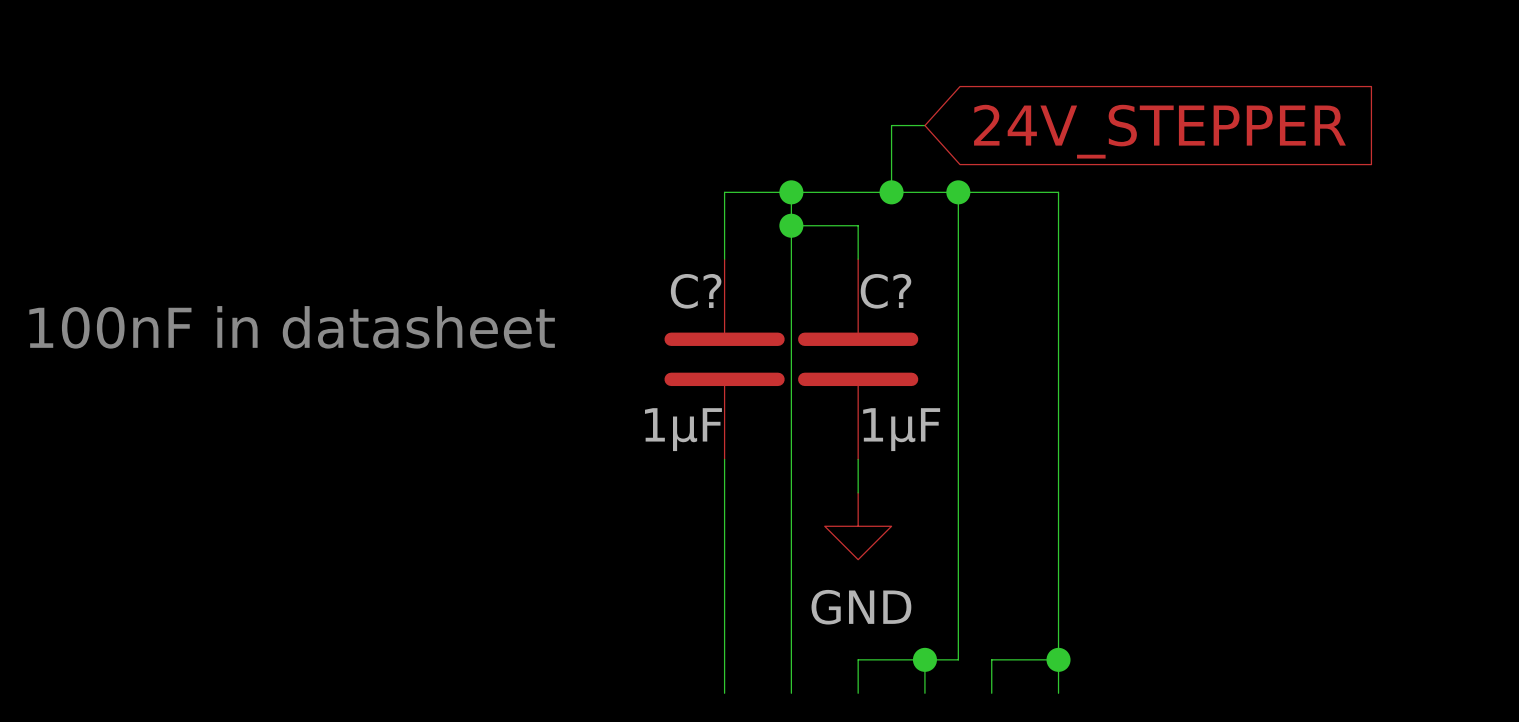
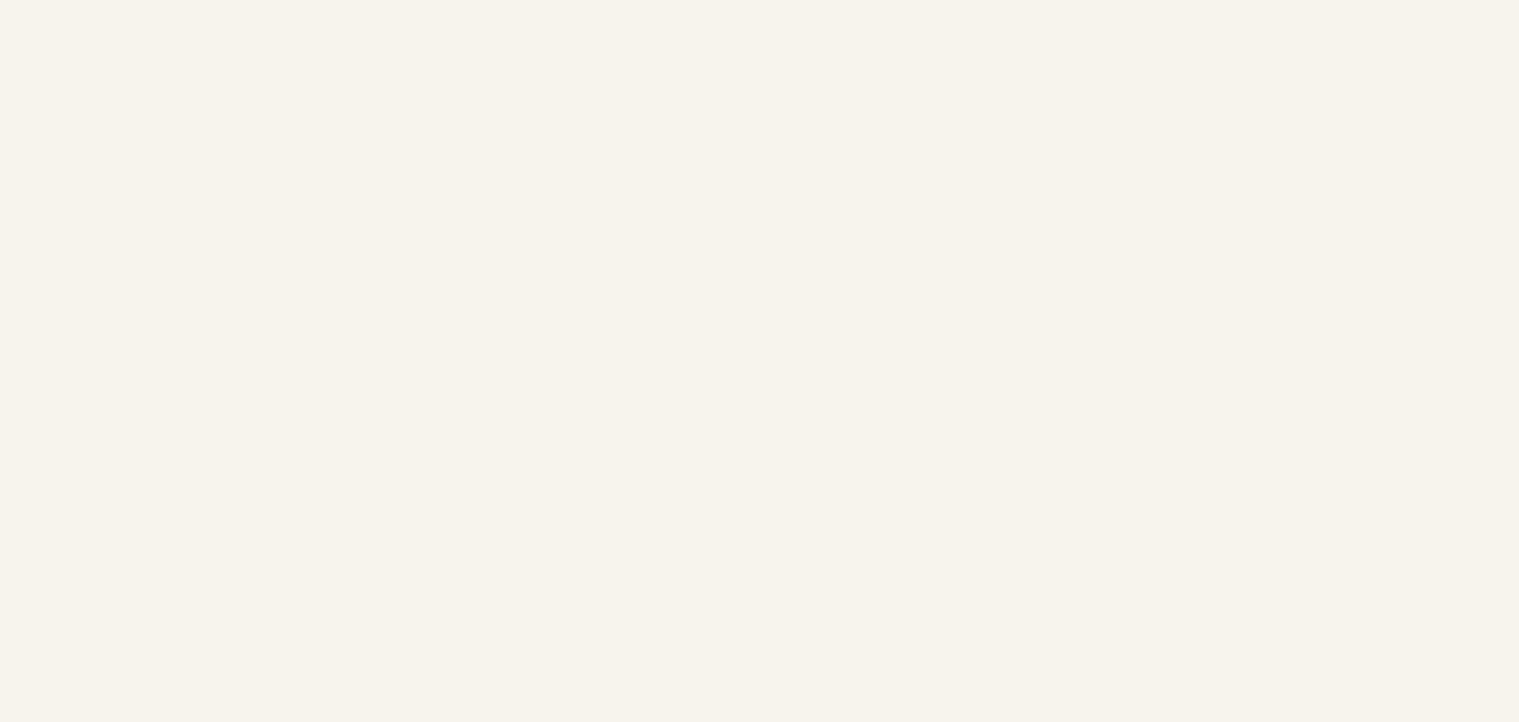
wire: (924, 125) (891, 125) (891, 192) -> none
global label: 24V_STEPPER (1159, 131) -> none
wire: (791, 192) (791, 693) -> none
junction: (791, 192) -> none
junction: (891, 192) -> none
wire: (958, 192) (958, 659) (858, 659) (858, 693) -> none
junction: (958, 192) -> none
wire: (791, 225) (858, 225) (858, 259) -> none
junction: (791, 225) -> none
wire: (724, 259) (724, 192) (1058, 192) (1058, 693) -> none
text: 100nF in datasheet (292, 327) -> none
C?: 1μF (724, 359) -> none
C?: 1μF (858, 359) -> none
wire: (724, 459) (724, 693) -> none
wire: (858, 459) (858, 492) -> none
power symbol: GND (858, 526) -> none
wire: (924, 659) (924, 693) -> none
junction: (924, 659) -> none
wire: (1058, 659) (991, 659) (991, 693) -> none
junction: (1058, 659) -> none

